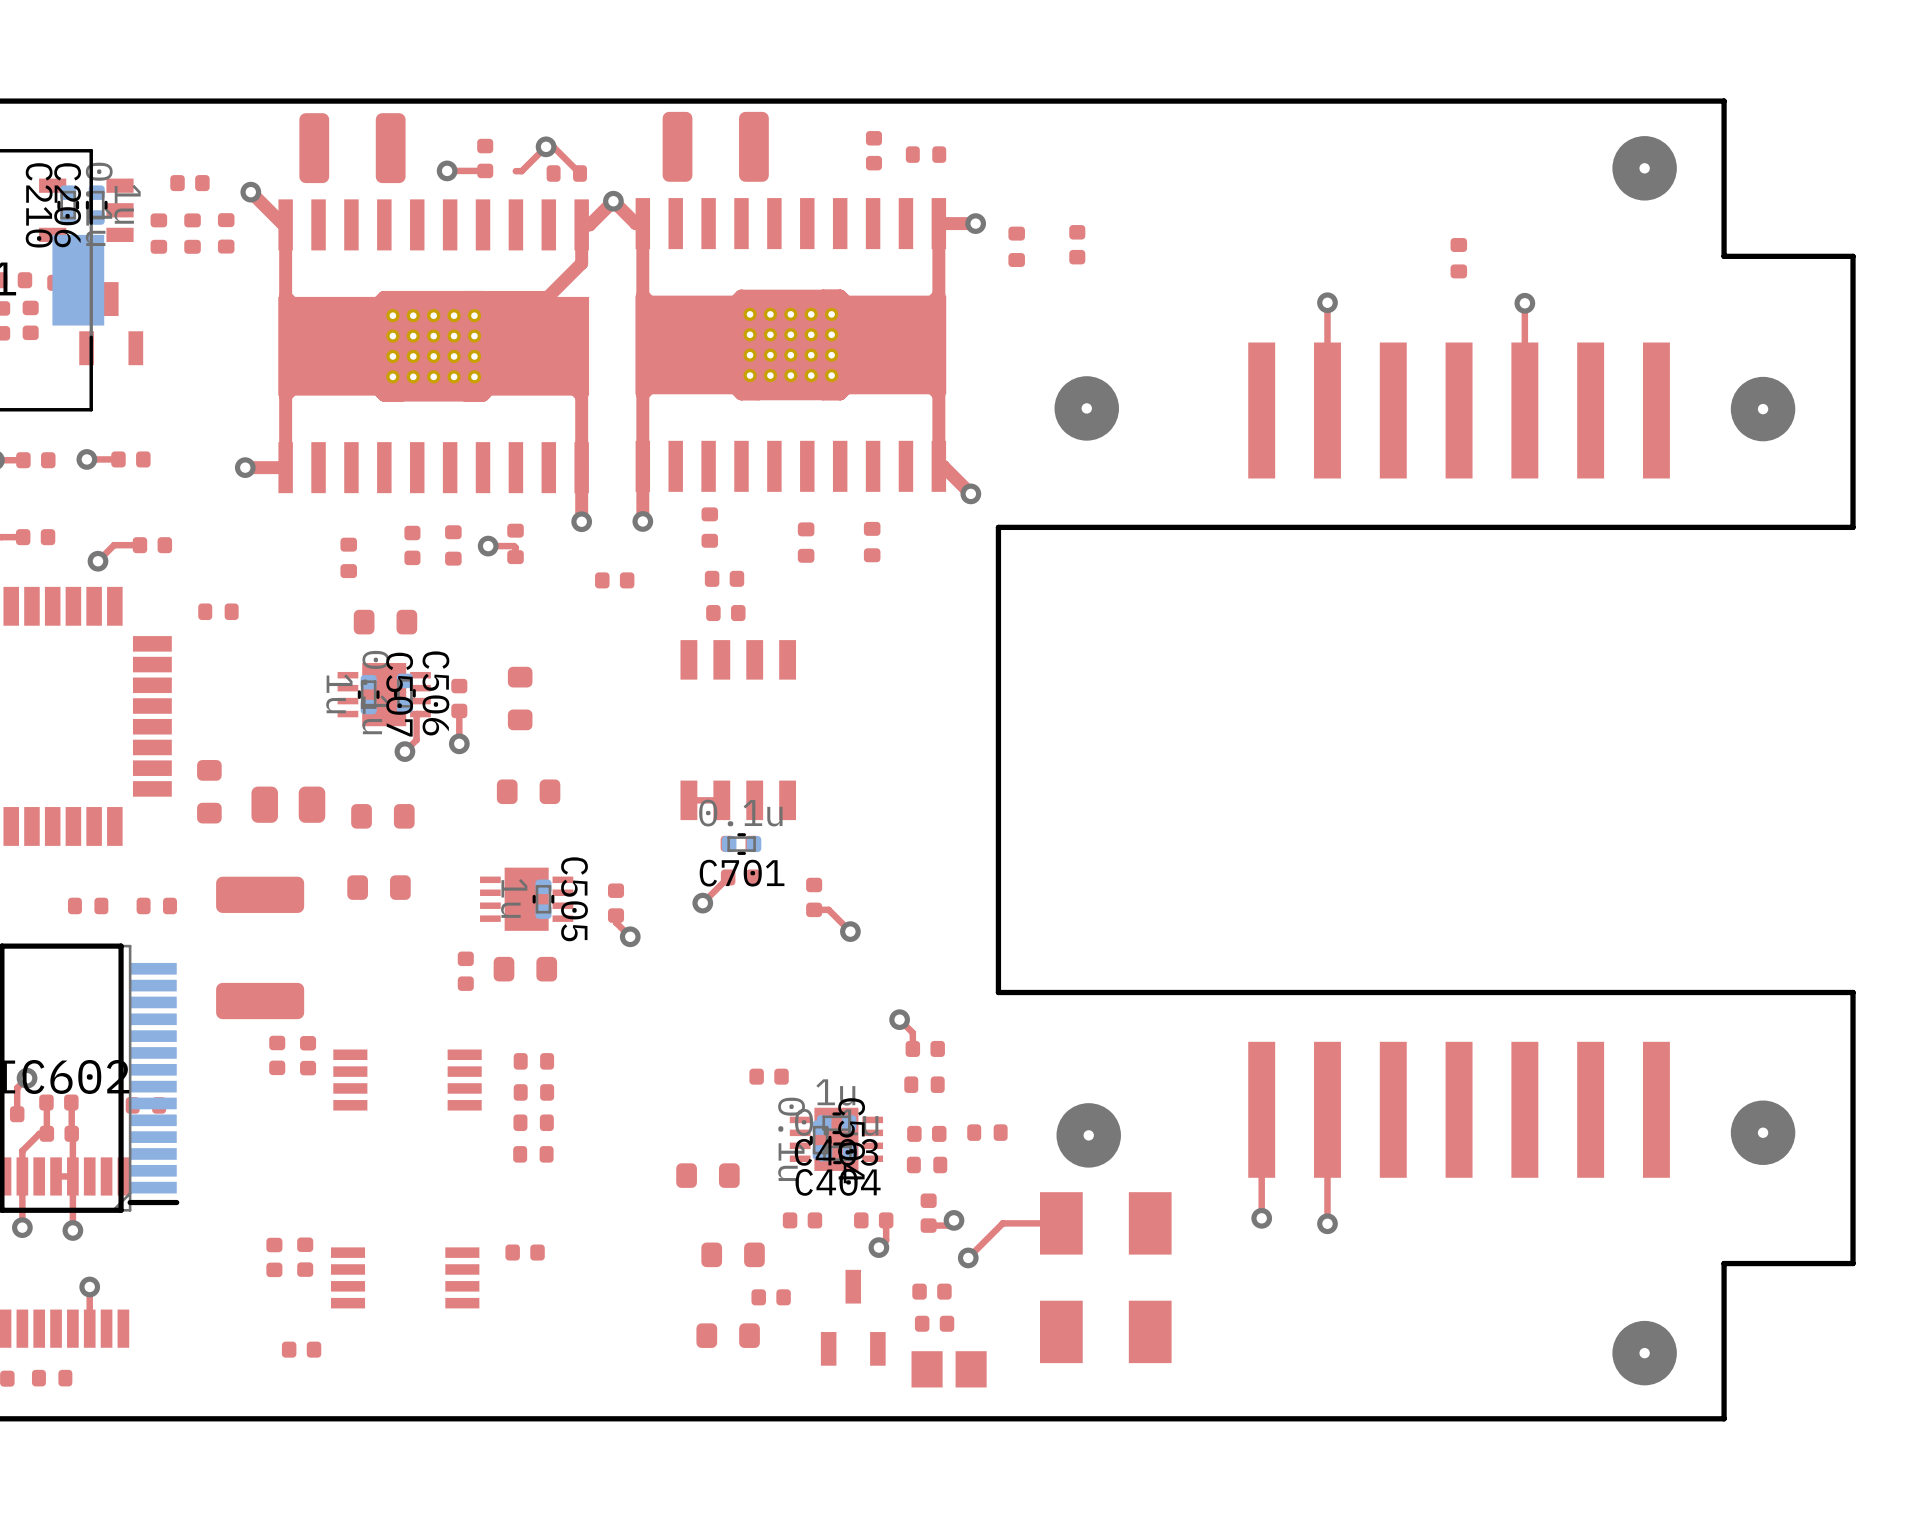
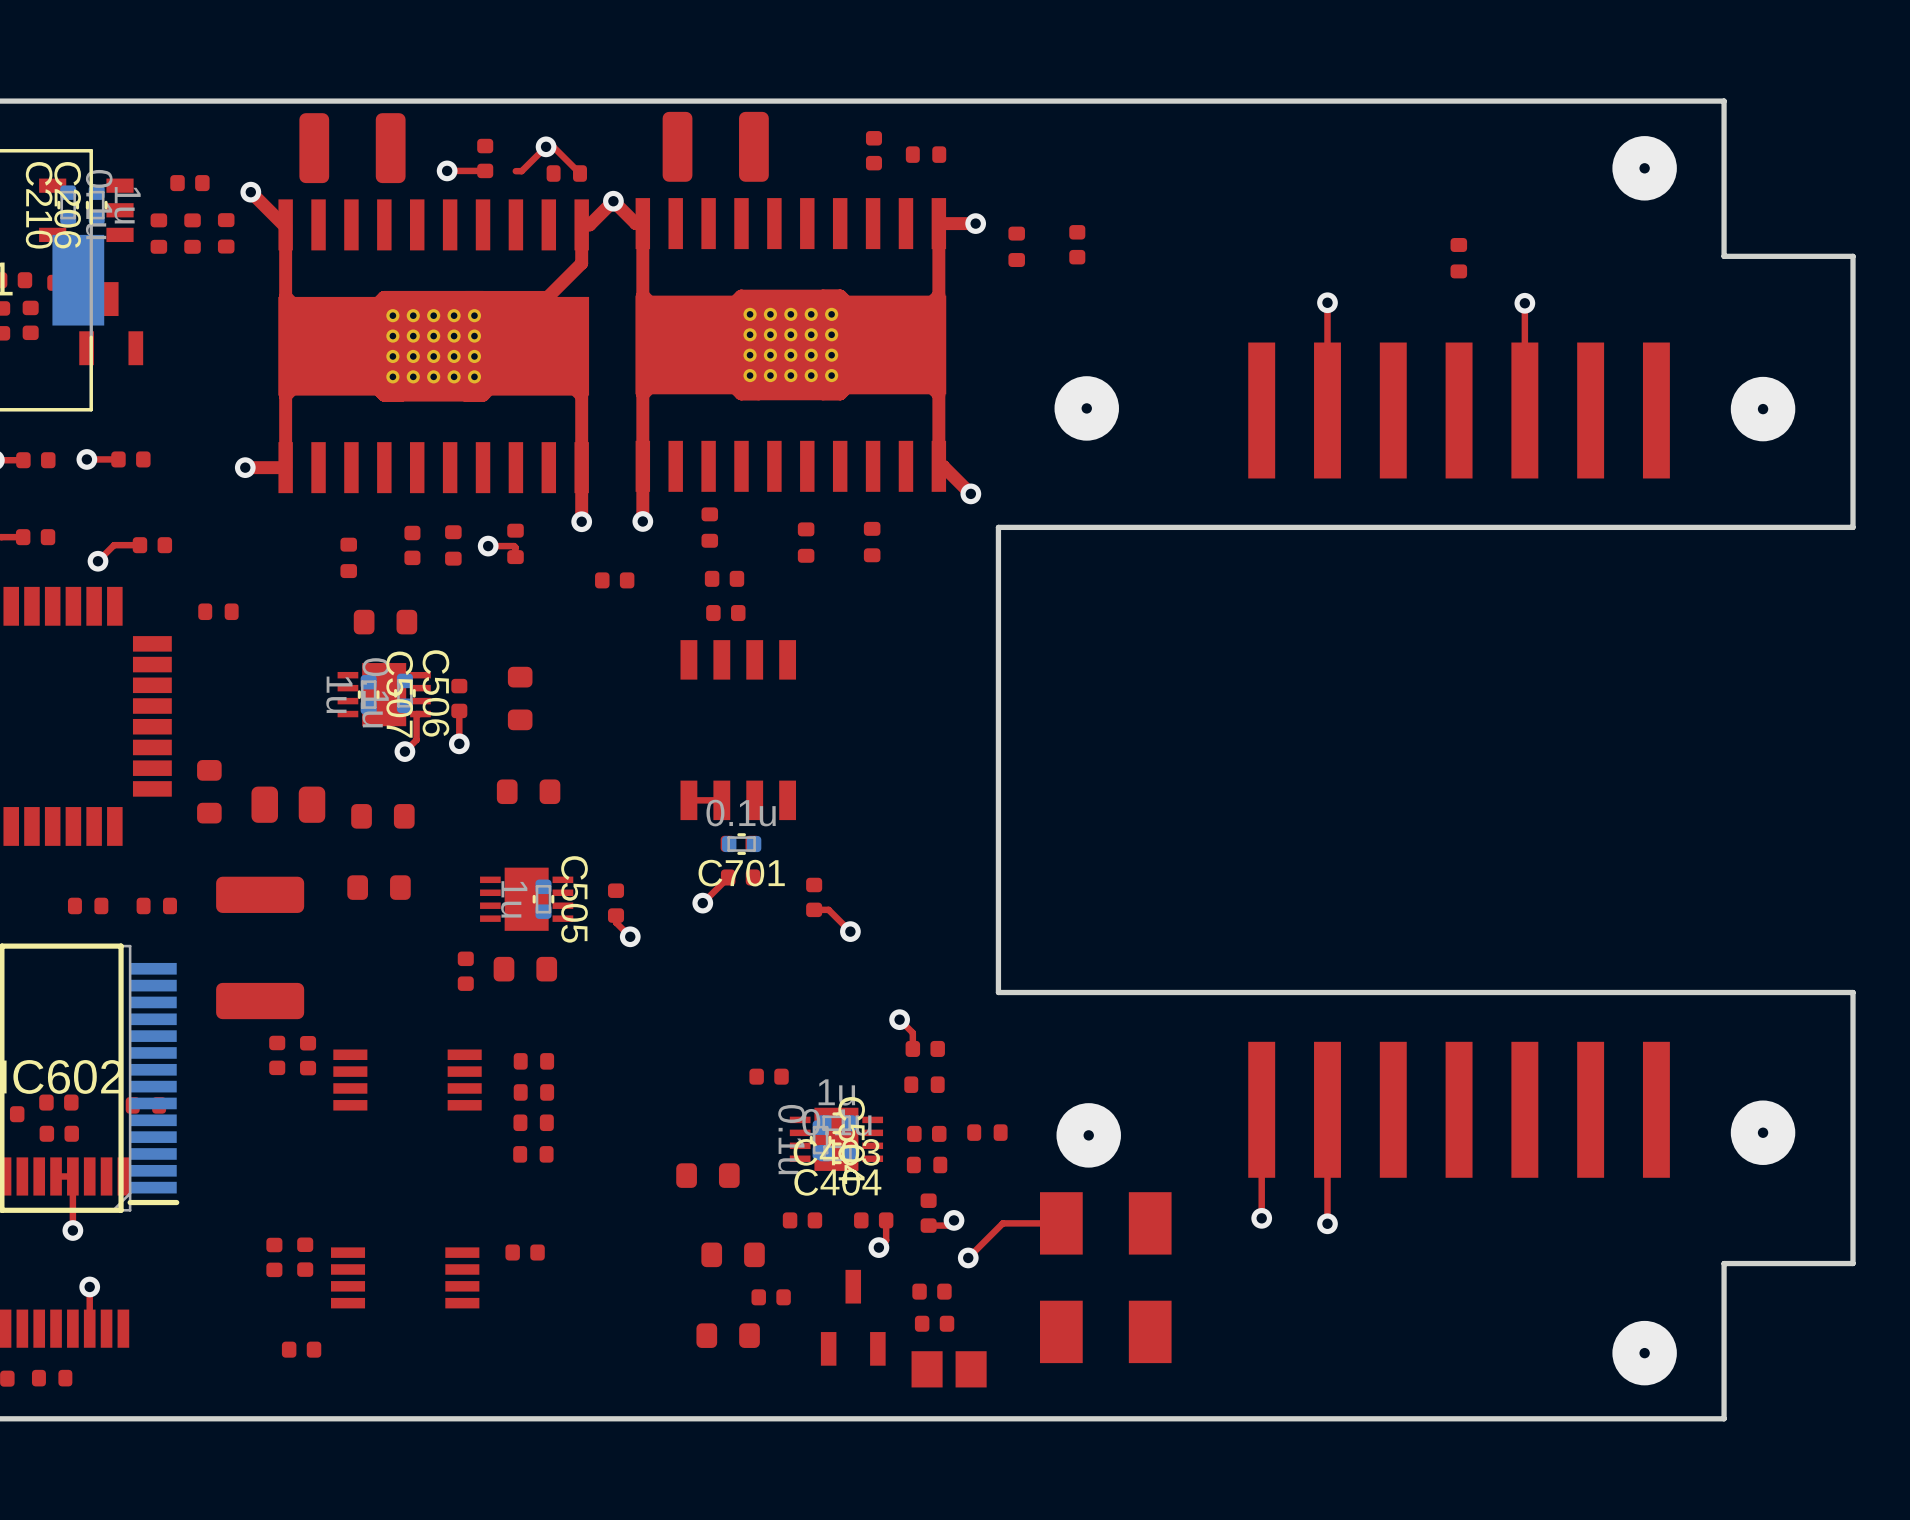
top track: (27, 1078) (17, 1088) (17, 1114) -> none
via: (27, 1078) -> none
top track: (46, 1102) (46, 1133) (39, 1133) (22, 1150) (22, 1227) -> none
top track: (71, 1102) (72, 1176) -> none
via: (22, 1227) -> none

